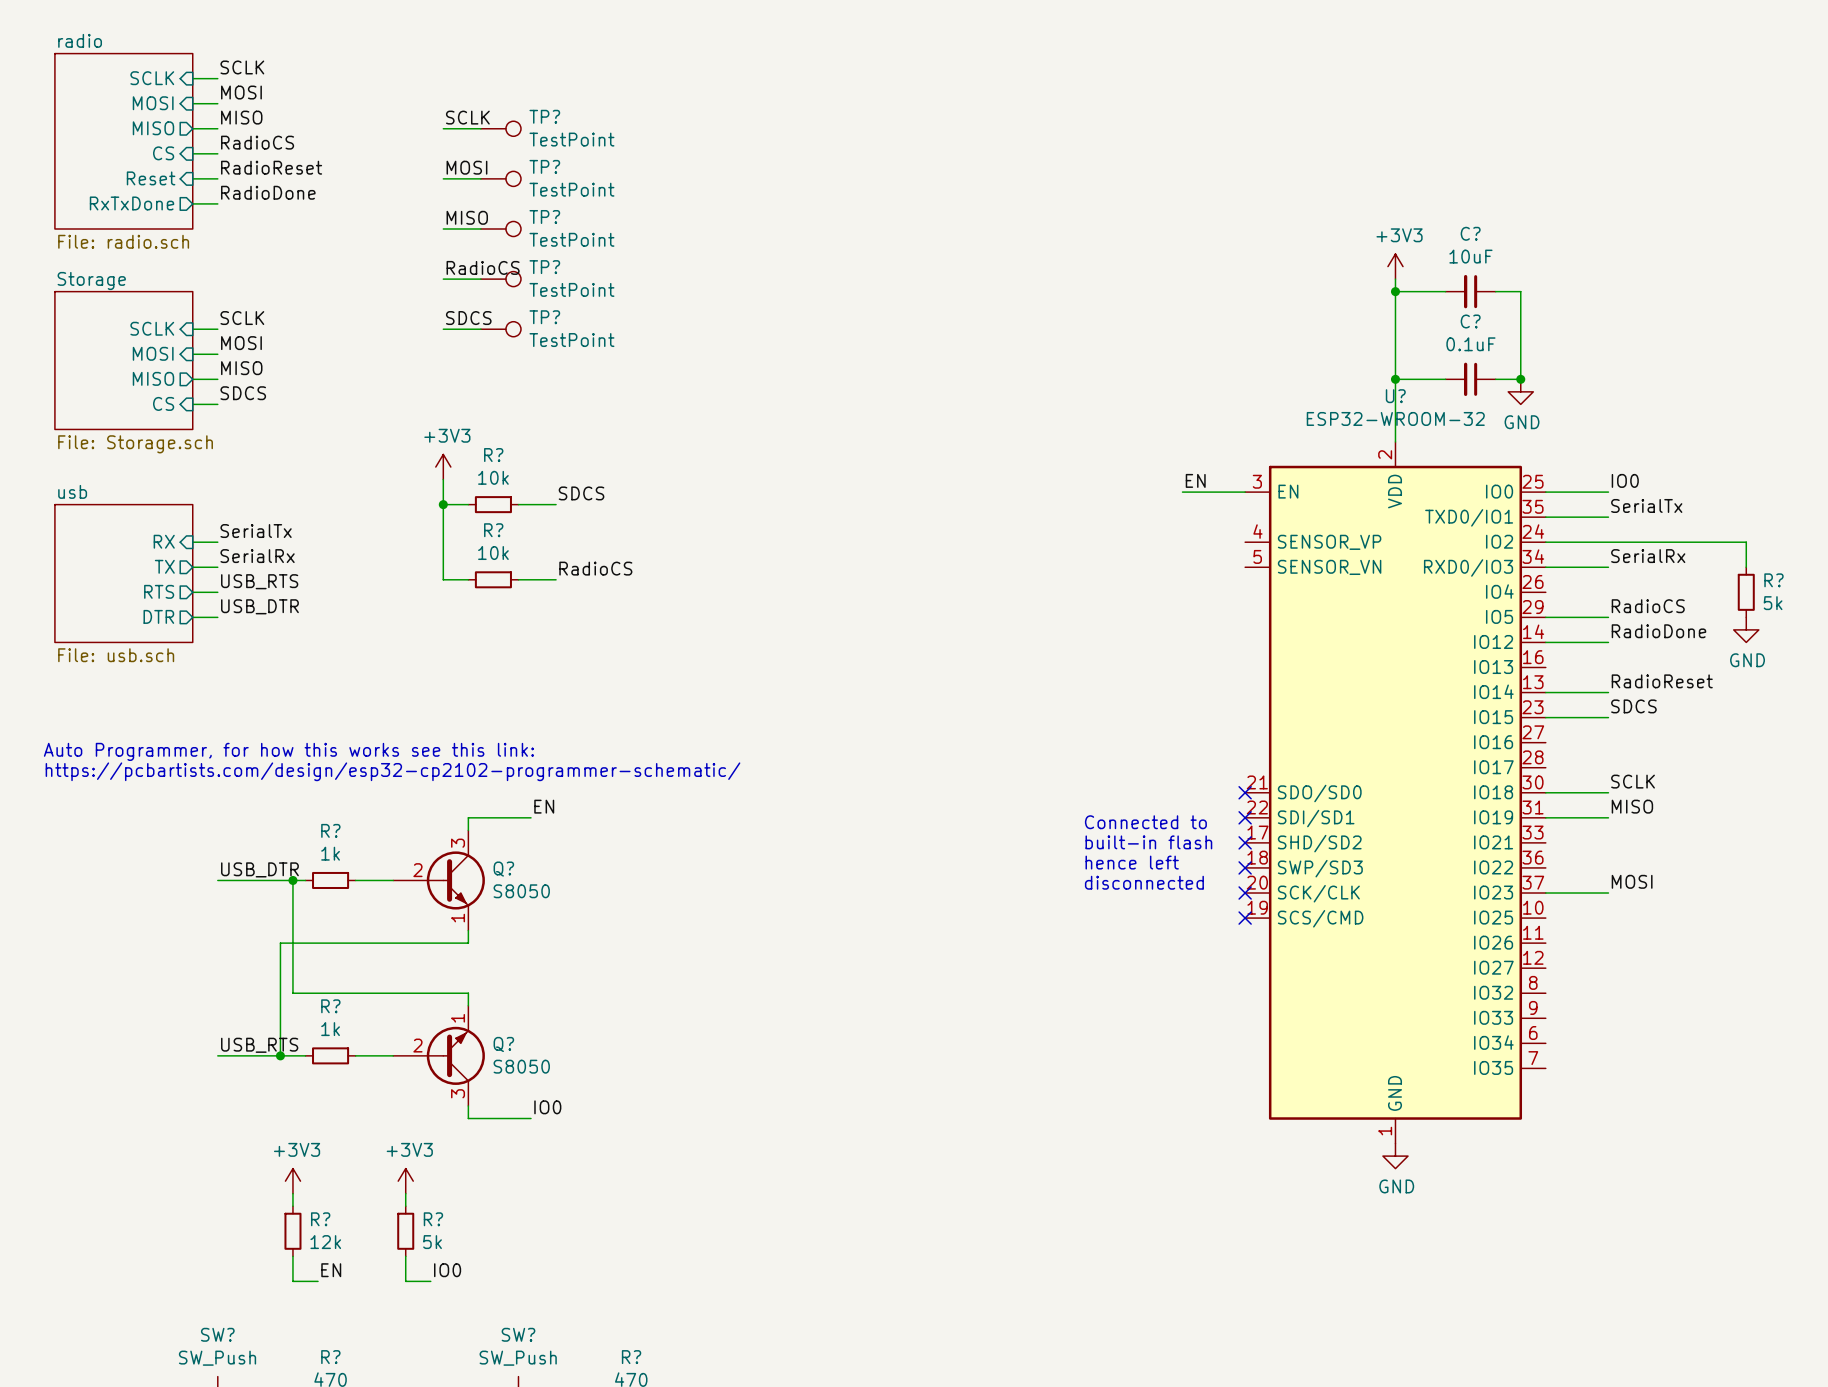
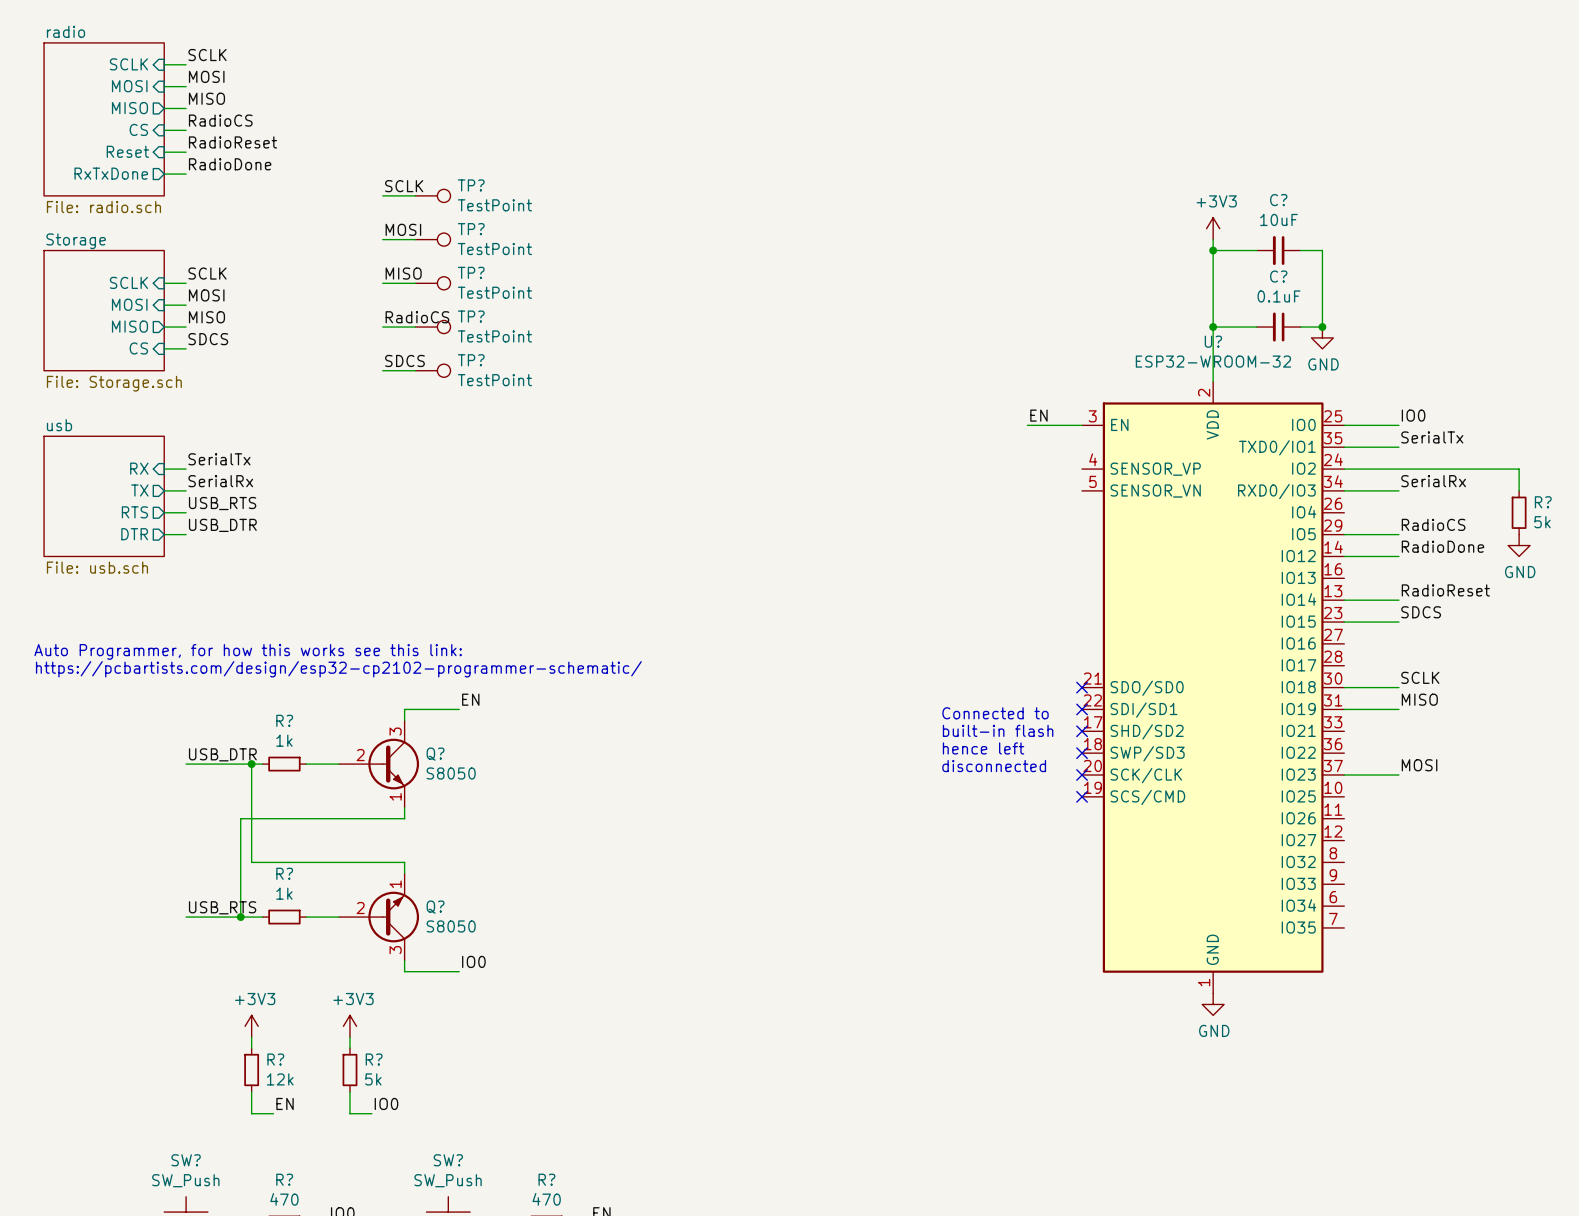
label: SCLK (467, 117) -> none
wire: (443, 128) (480, 128) -> none
TP?: TestPoint (500, 128) -> none
label: MOSI (466, 167) -> none
wire: (443, 178) (480, 178) -> (382, 327) (415, 327)
TP?: TestPoint (500, 178) -> none
label: MISO (467, 217) -> SCLK (404, 186)
label: RadioCS (483, 267) -> MOSI (403, 229)
label: SDCS (468, 318) -> MISO (403, 273)
TP?: none -> TestPoint (433, 327)
TP?: none -> TestPoint (433, 370)
power symbol: +3V3 (443, 467) -> none
wire: (443, 479) (443, 579) (468, 579) -> none
label position: SDCS (581, 493) -> SDCS (404, 360)
wire: (443, 504) (468, 504) -> none
junction: (443, 504) -> none
R?: 10k (493, 504) -> none
wire: (518, 504) (556, 504) -> (382, 370) (415, 370)
label position: RadioCS (595, 568) -> RadioCS (417, 317)
R?: 10k (493, 579) -> none
wire: (518, 579) (556, 579) -> none

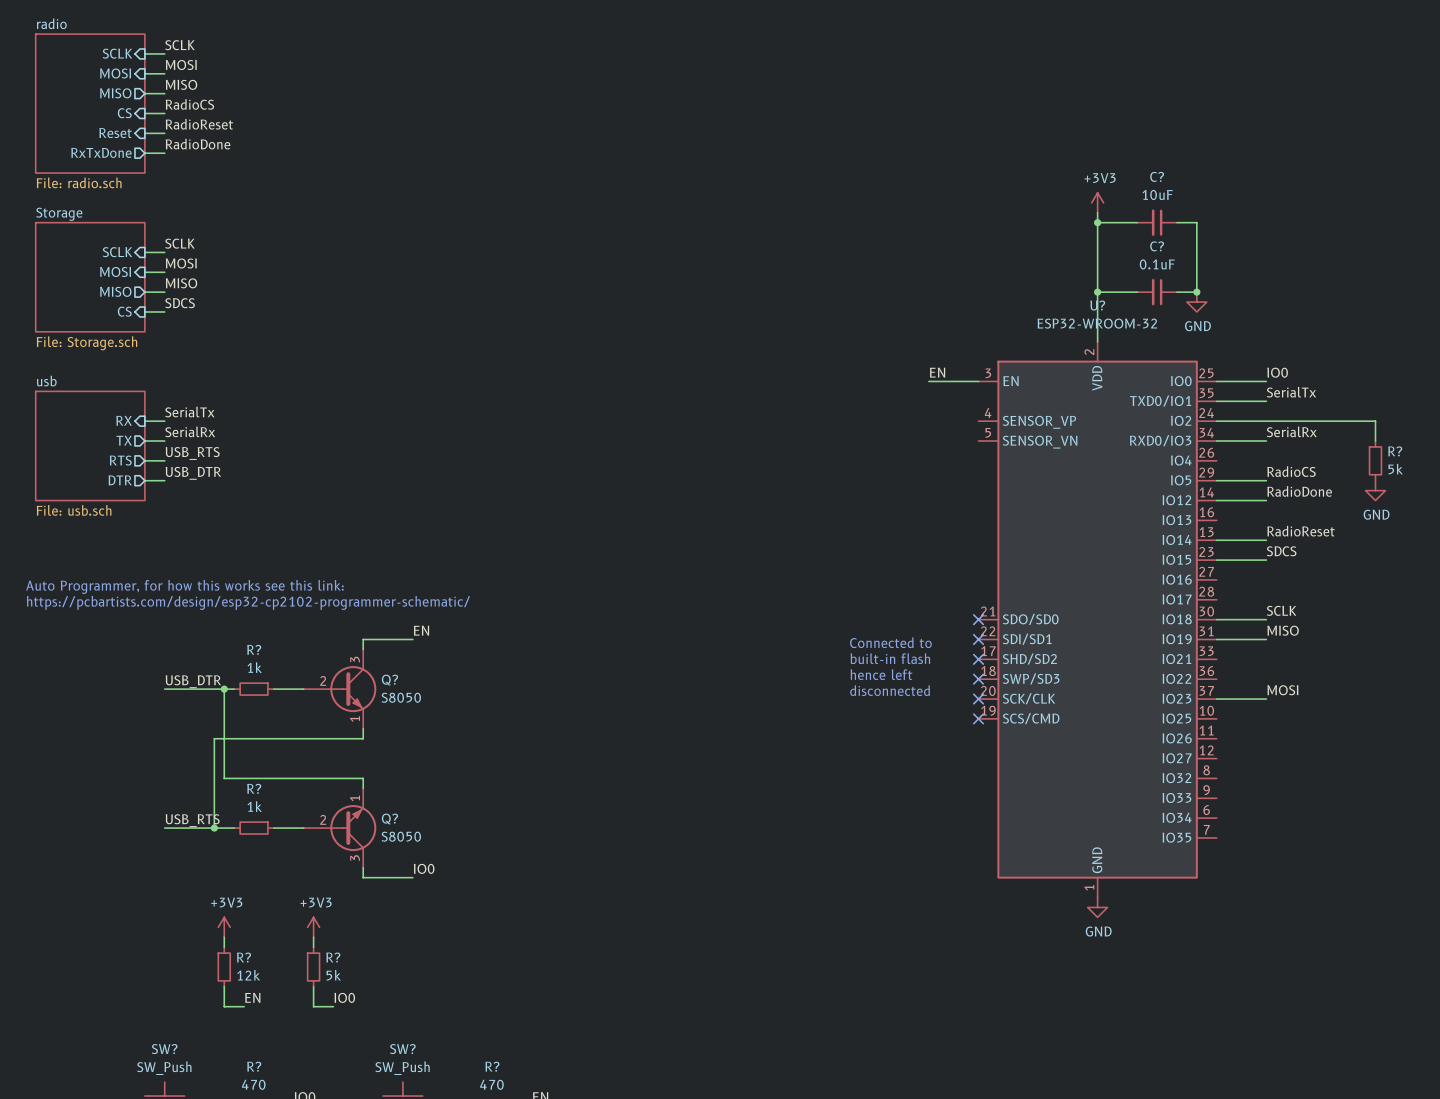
label: SCLK (404, 186) -> none
wire: (382, 195) (415, 195) -> none
TP?: TestPoint (433, 195) -> none
label: MOSI (403, 229) -> none
wire: (382, 239) (415, 239) -> none
TP?: TestPoint (433, 239) -> none
label: MISO (403, 273) -> none
wire: (382, 283) (415, 283) -> none
TP?: TestPoint (433, 283) -> none
label: RadioCS (417, 317) -> none
wire: (382, 327) (415, 327) -> none
TP?: TestPoint (433, 327) -> none
label: SDCS (404, 360) -> none
wire: (382, 370) (415, 370) -> none
TP?: TestPoint (433, 370) -> none

